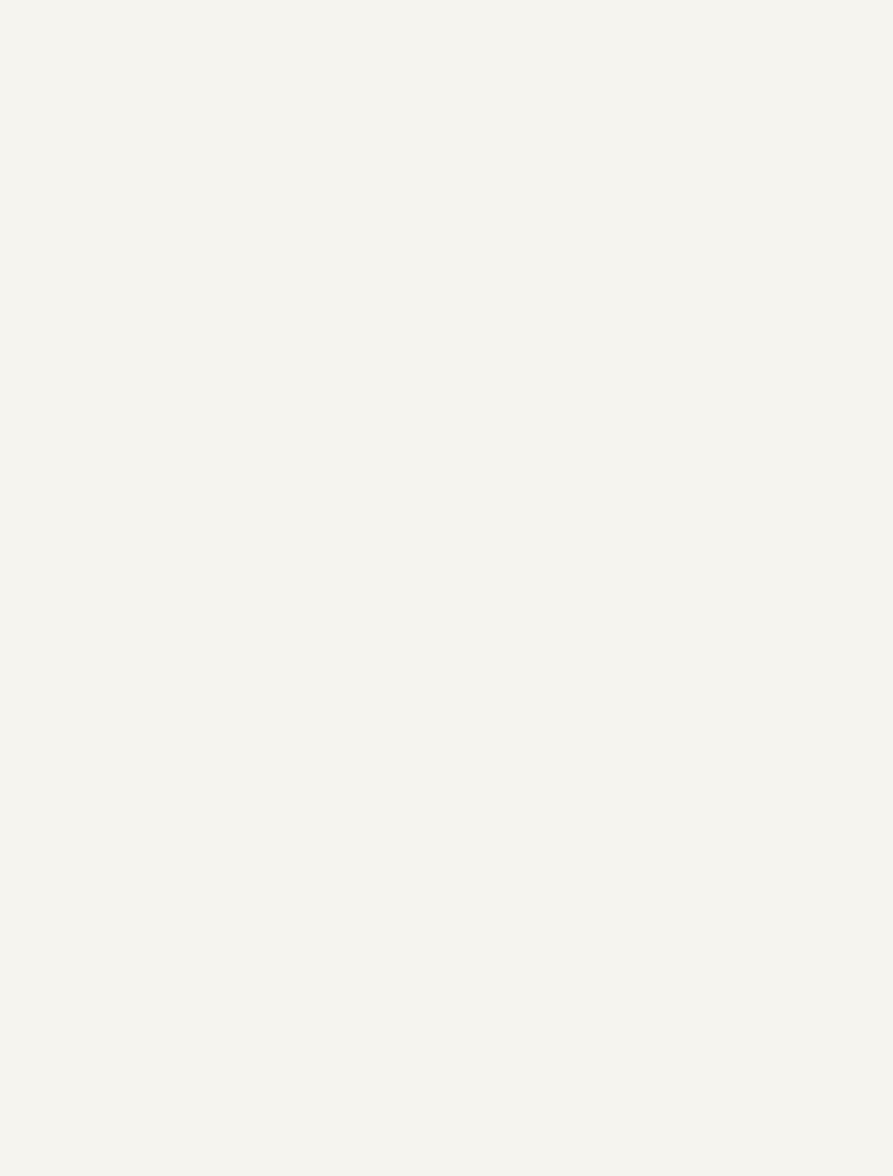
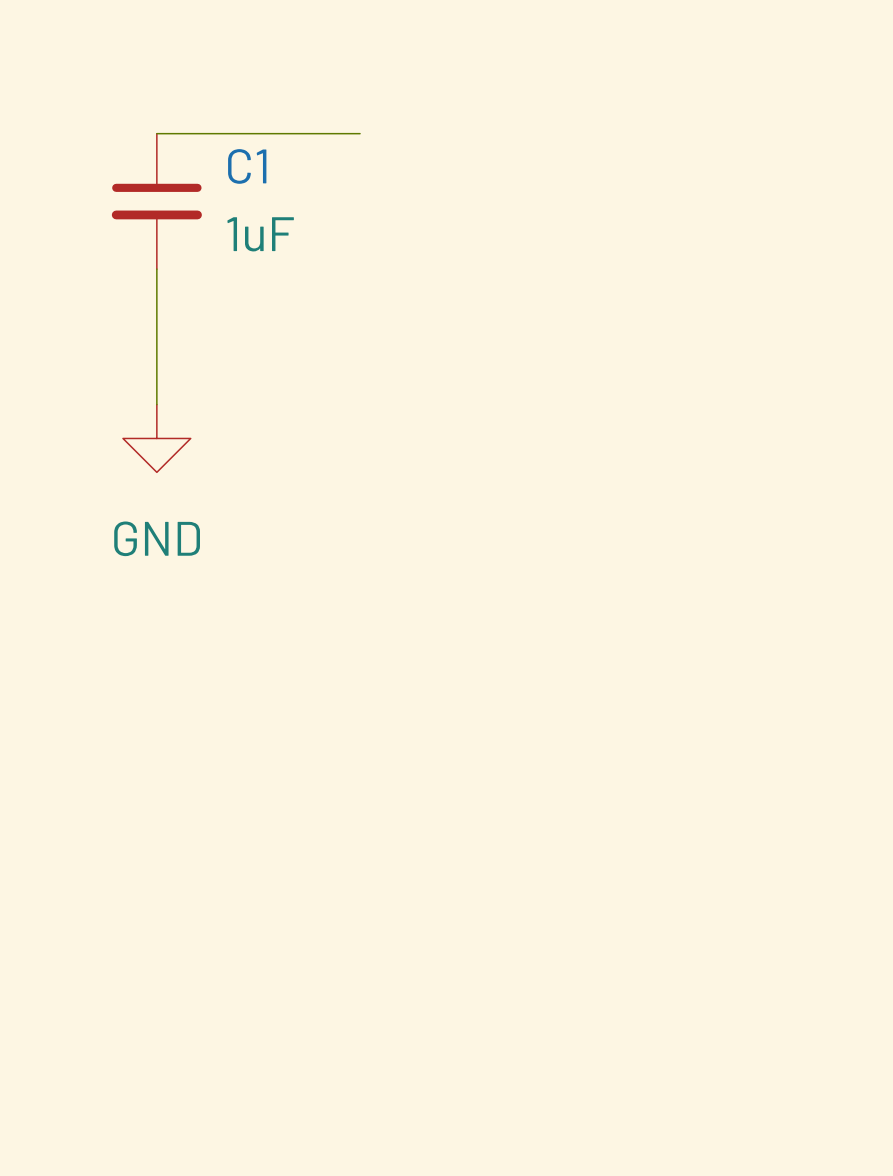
wire: none -> (156, 133) (360, 133)
C1: none -> 1uF (156, 201)
wire: none -> (156, 269) (156, 404)
power symbol: none -> GND (156, 438)

